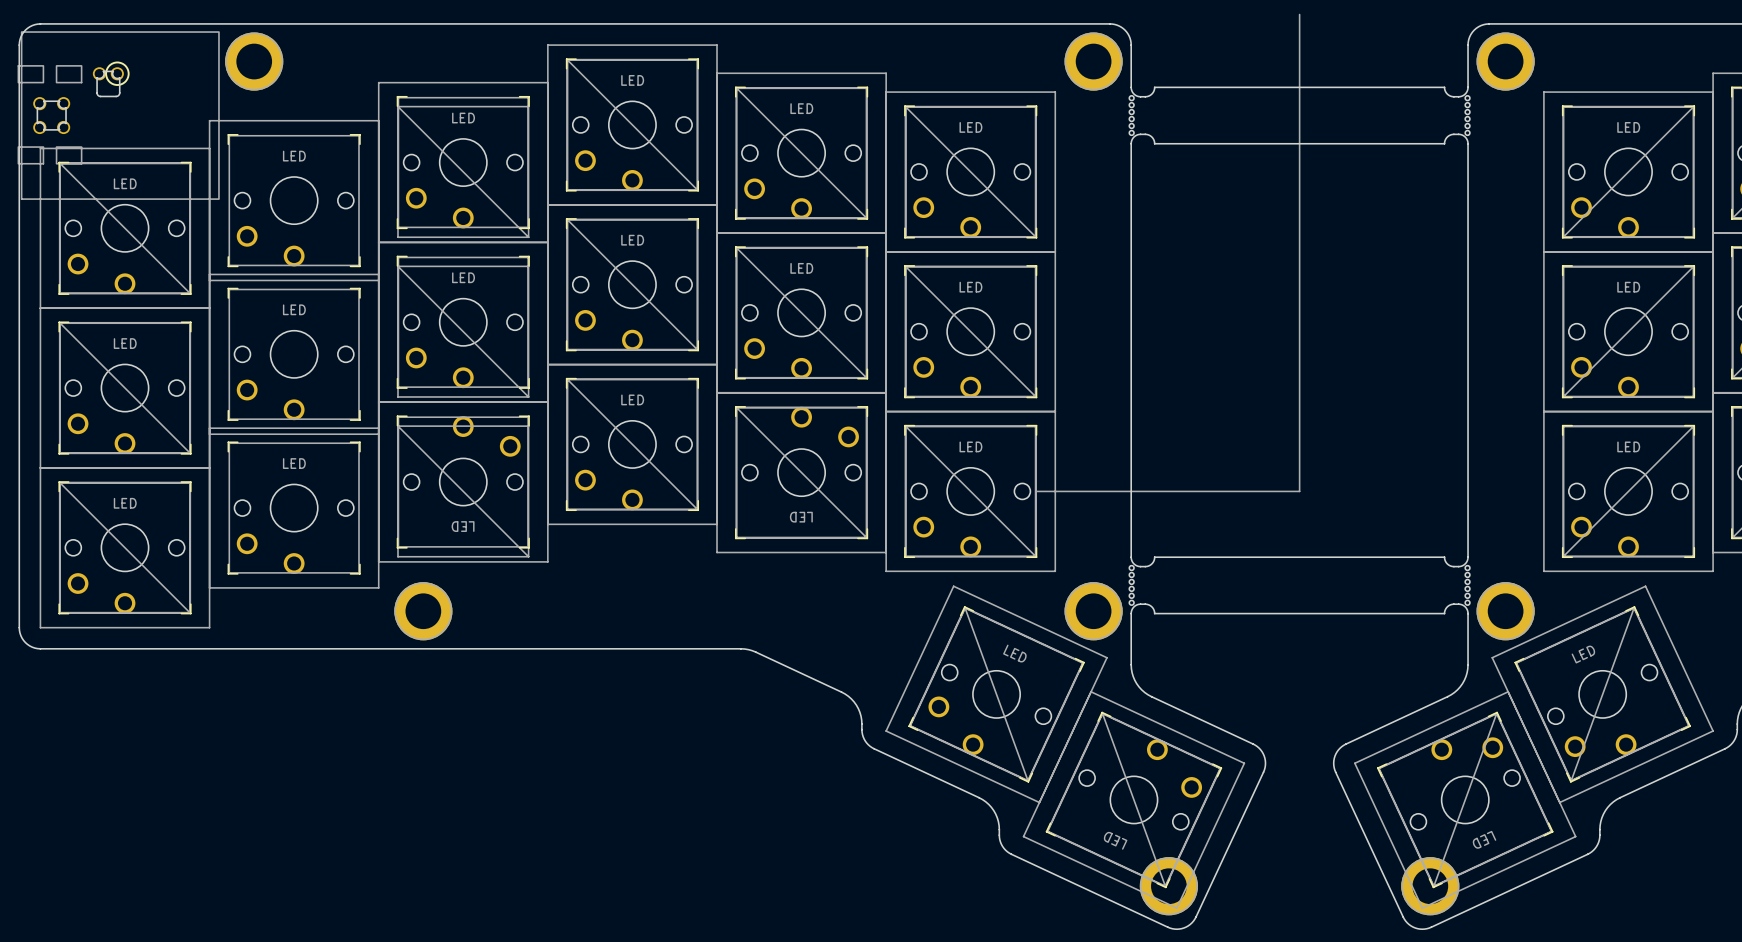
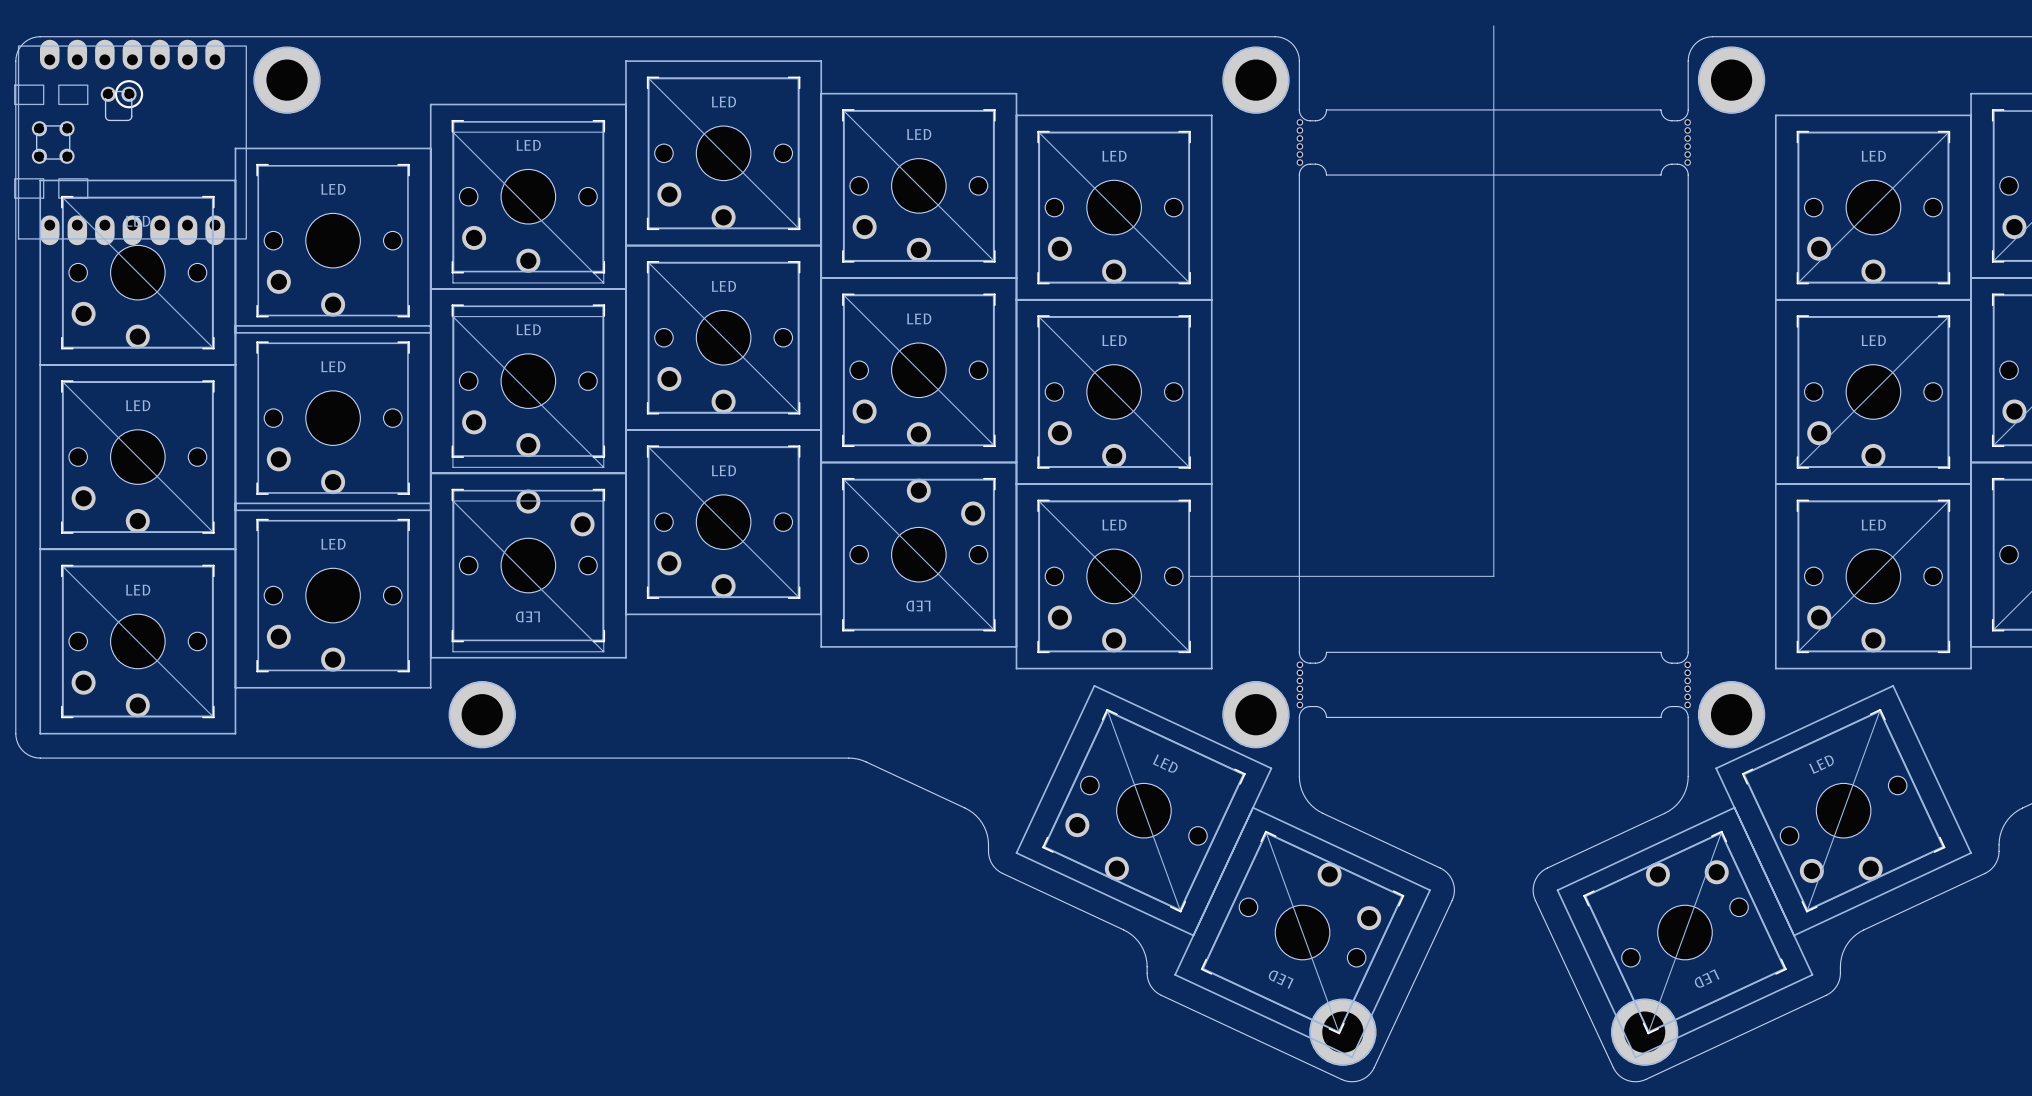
part footprint: [17, 31, 220, 200] -> [14, 39, 247, 246]

